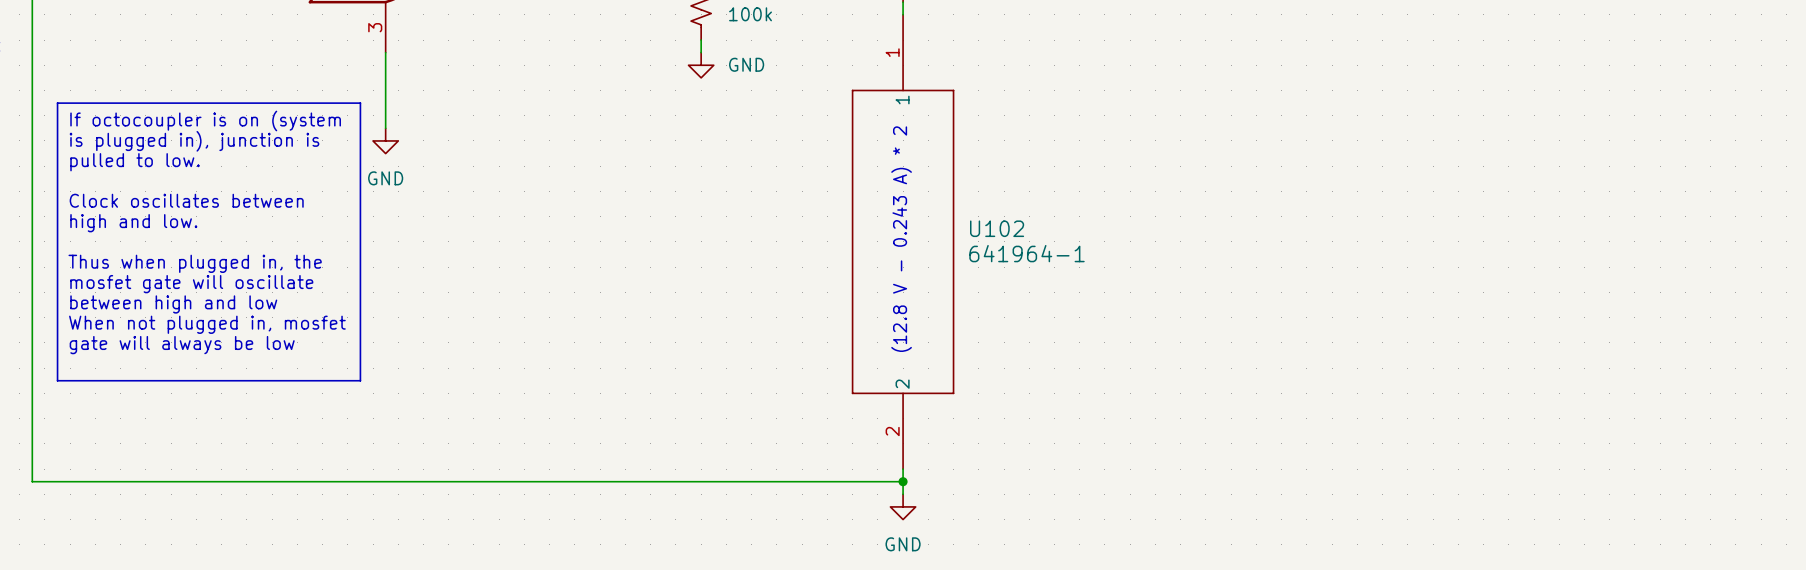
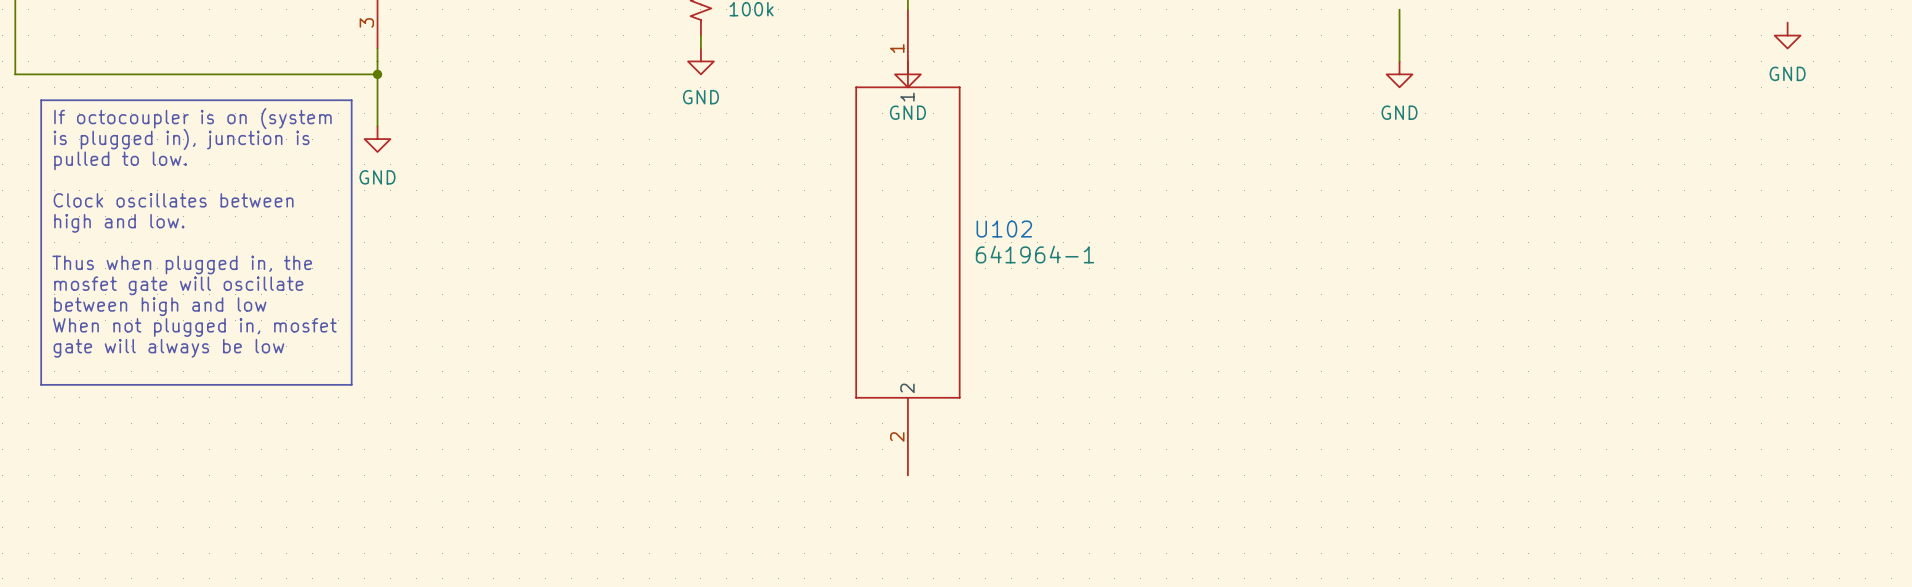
wire: none -> (1399, 9) (1399, 61)
power symbol: none -> GND (1787, 35)
power symbol text position: GND (746, 64) -> GND (700, 97)
wire: (32, 77) (32, 481) (903, 481) -> (15, 74) (377, 74)
junction: none -> (377, 74)
power symbol: none -> GND (907, 74)
power symbol: none -> GND (1399, 74)
text: (12.8 V - 0.243 A) * 2 (901, 239) -> none
wire: (903, 469) (903, 494) -> none
junction: (903, 481) -> none
power symbol: GND (903, 506) -> none

